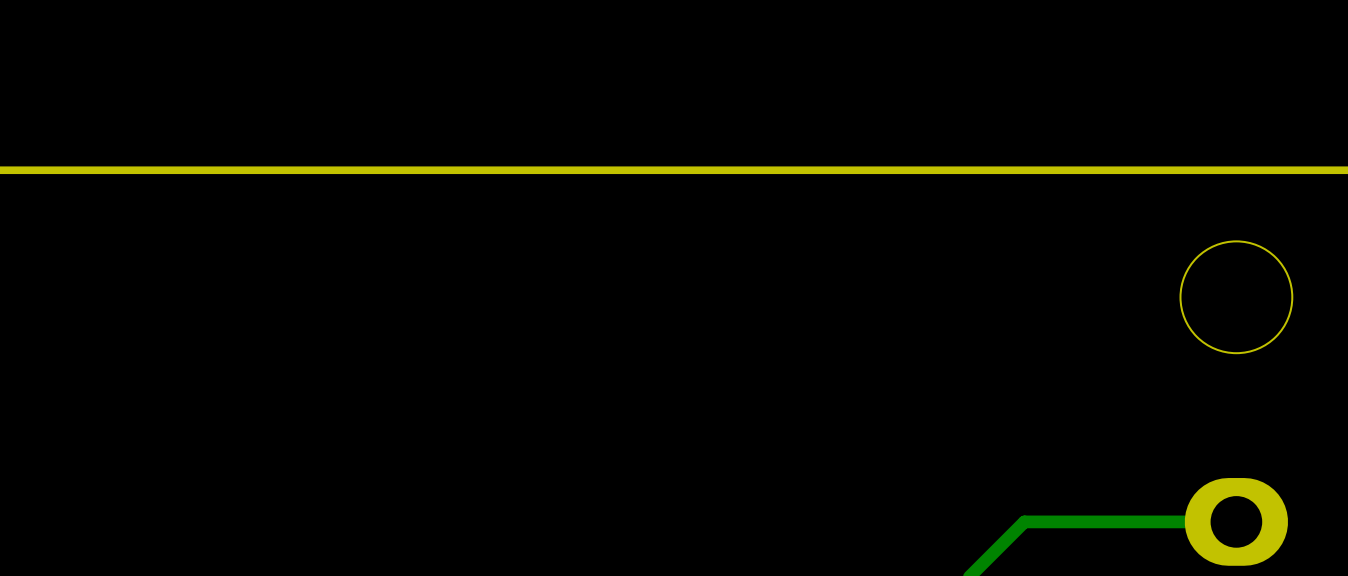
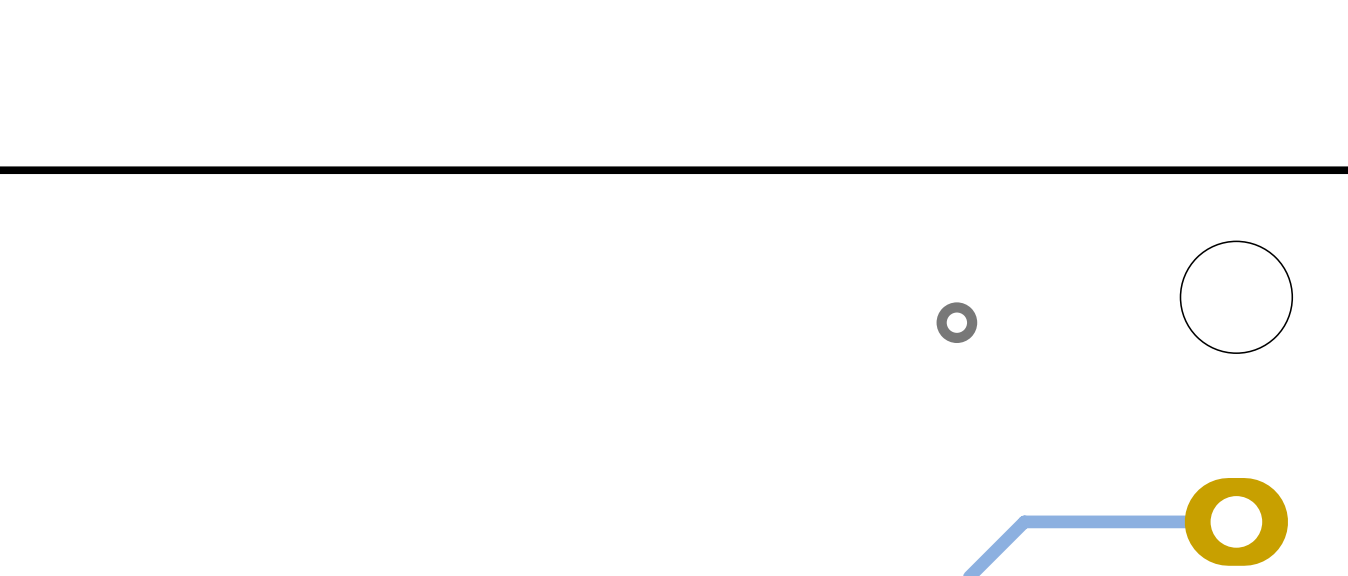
via: none -> (956, 322)

